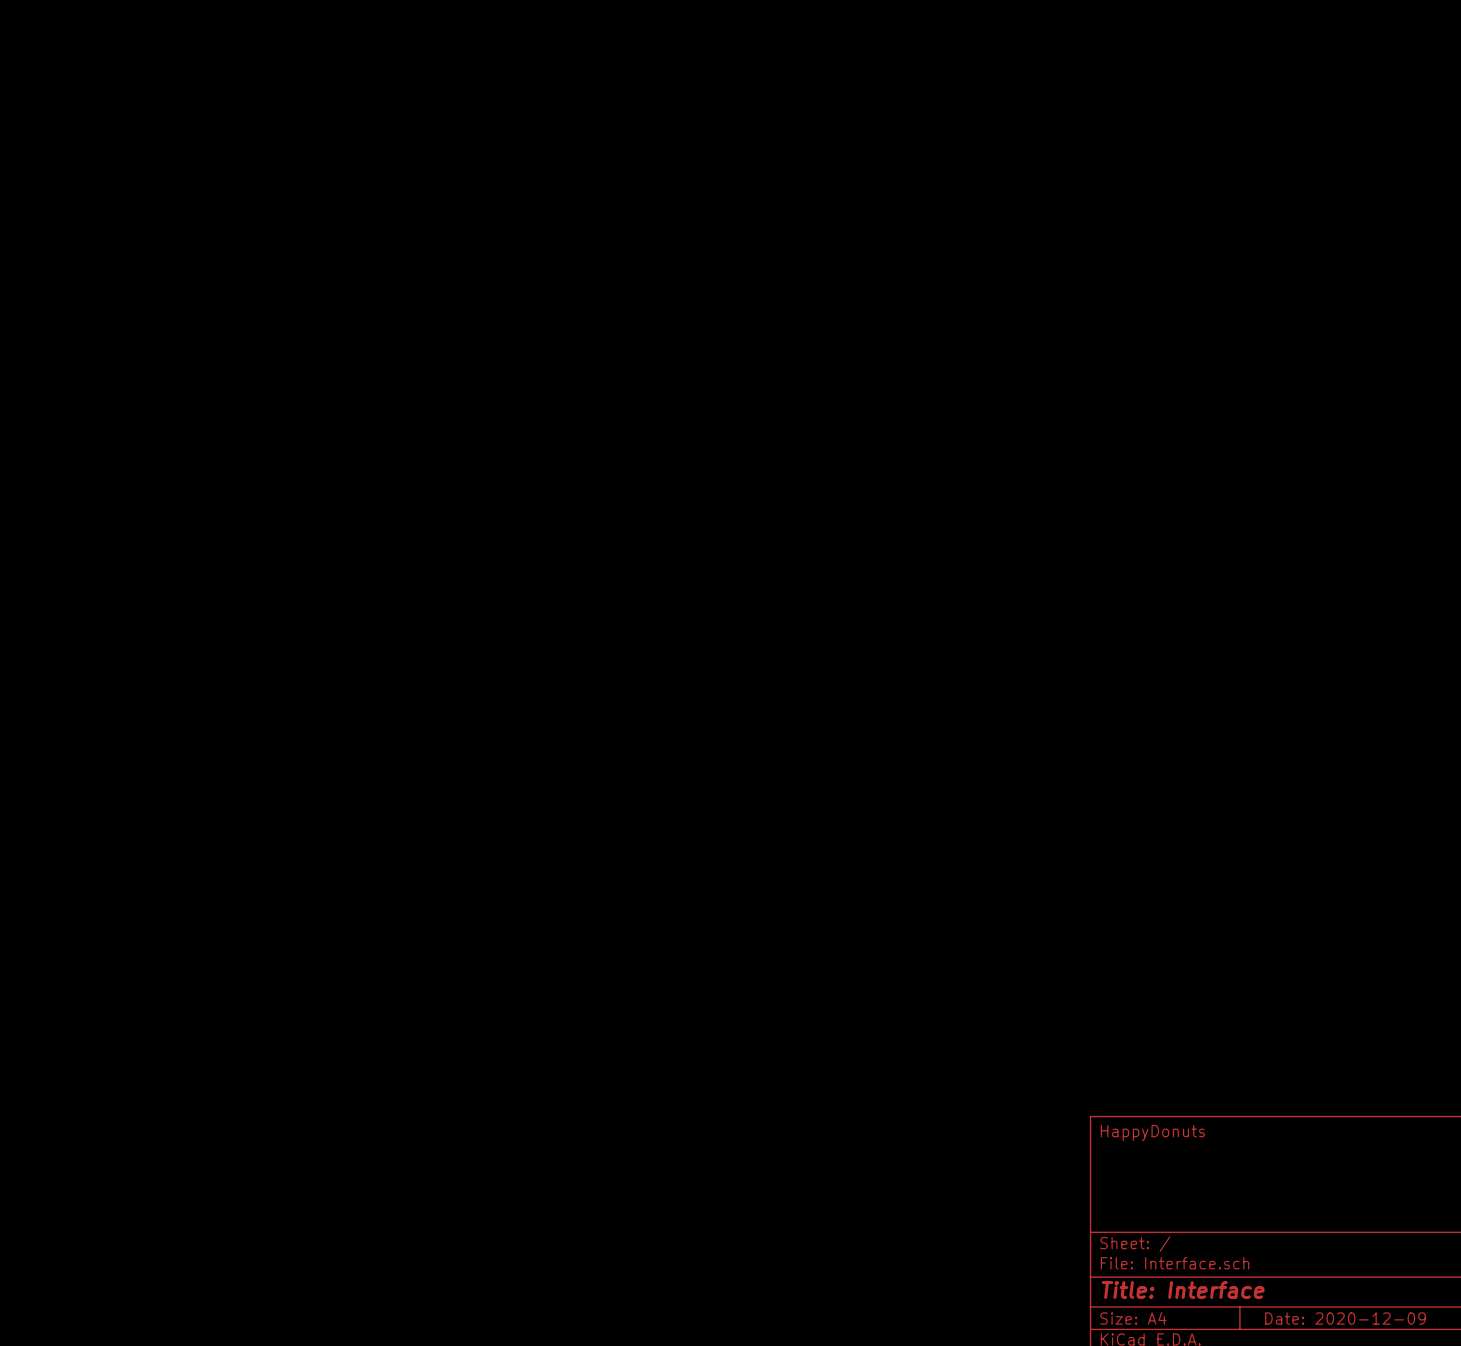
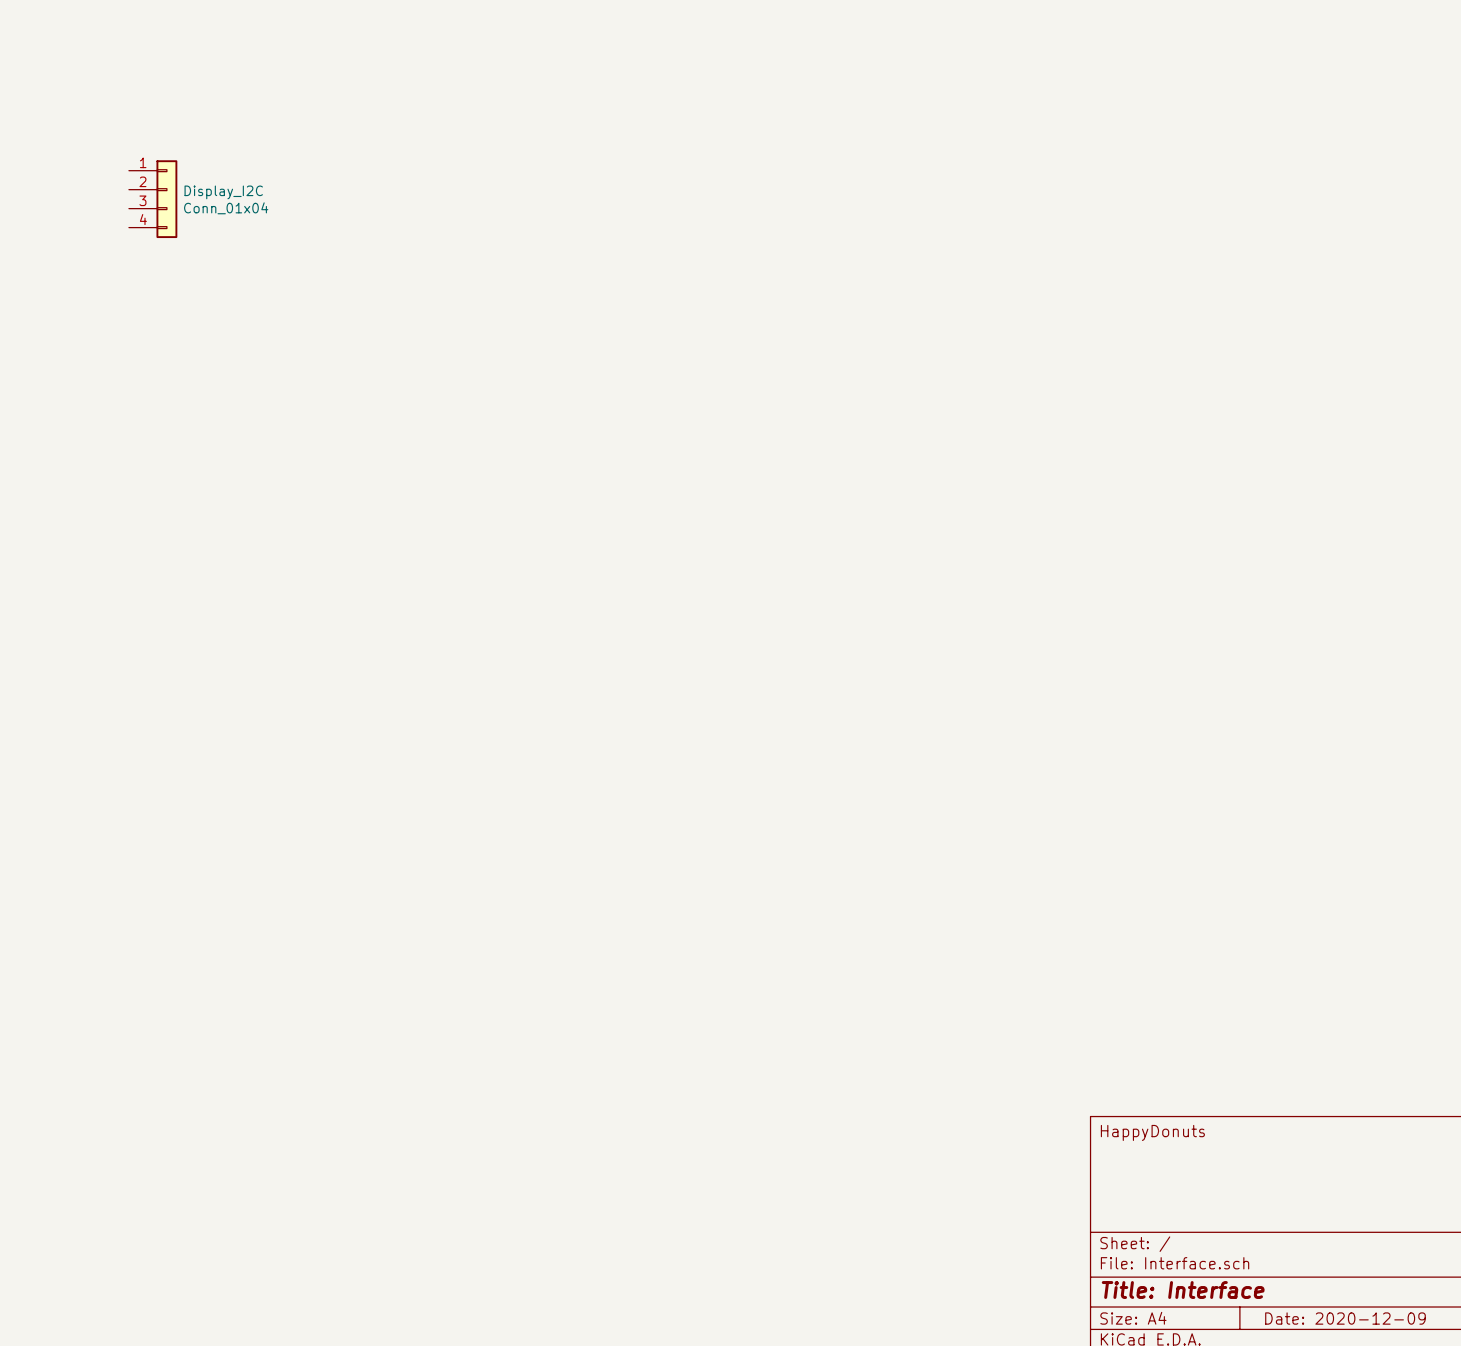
Display_I2C: none -> Conn_01x04 (153, 199)

